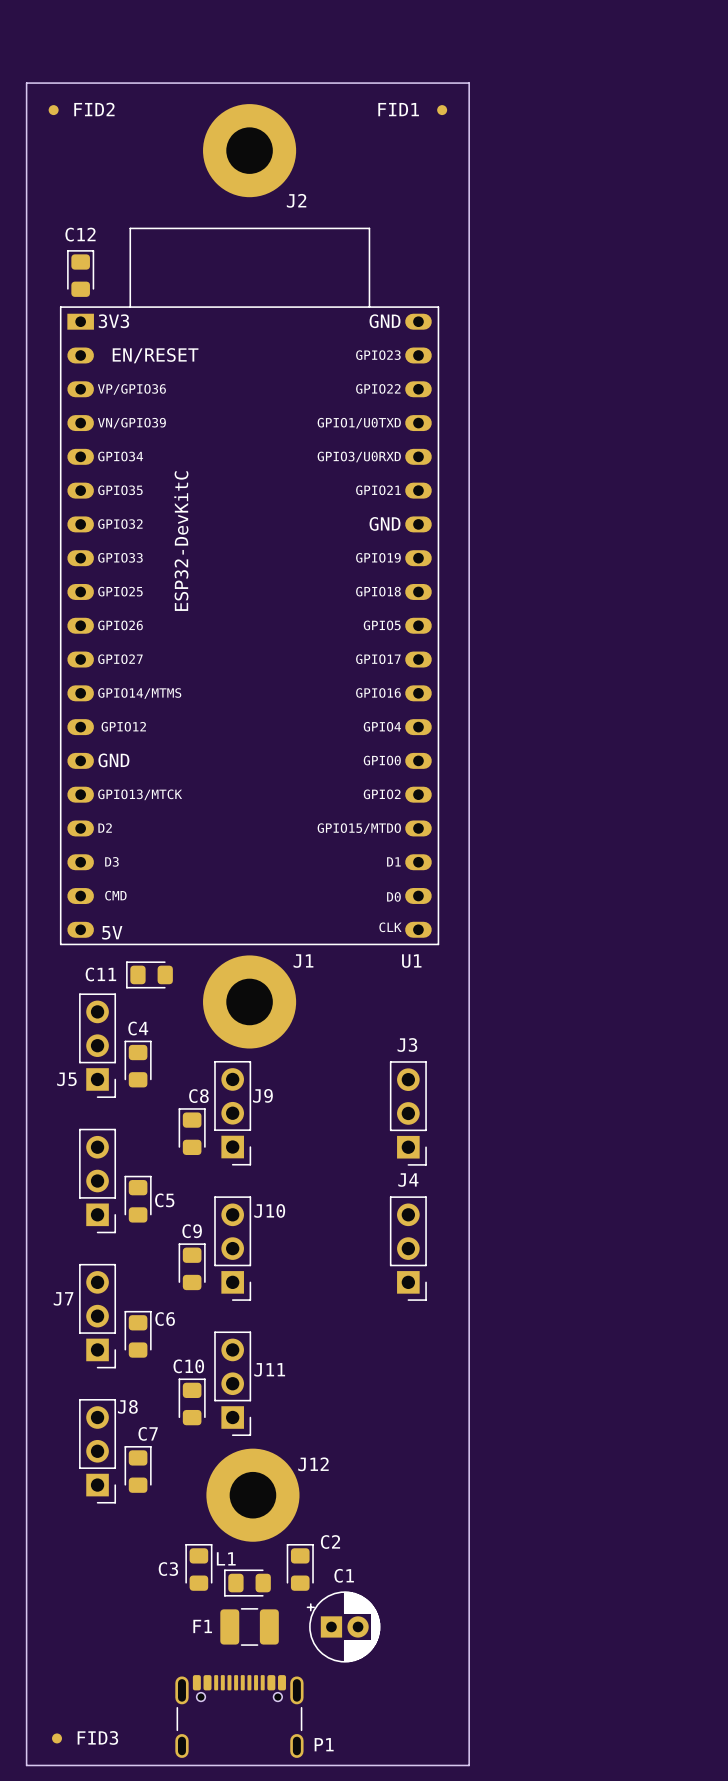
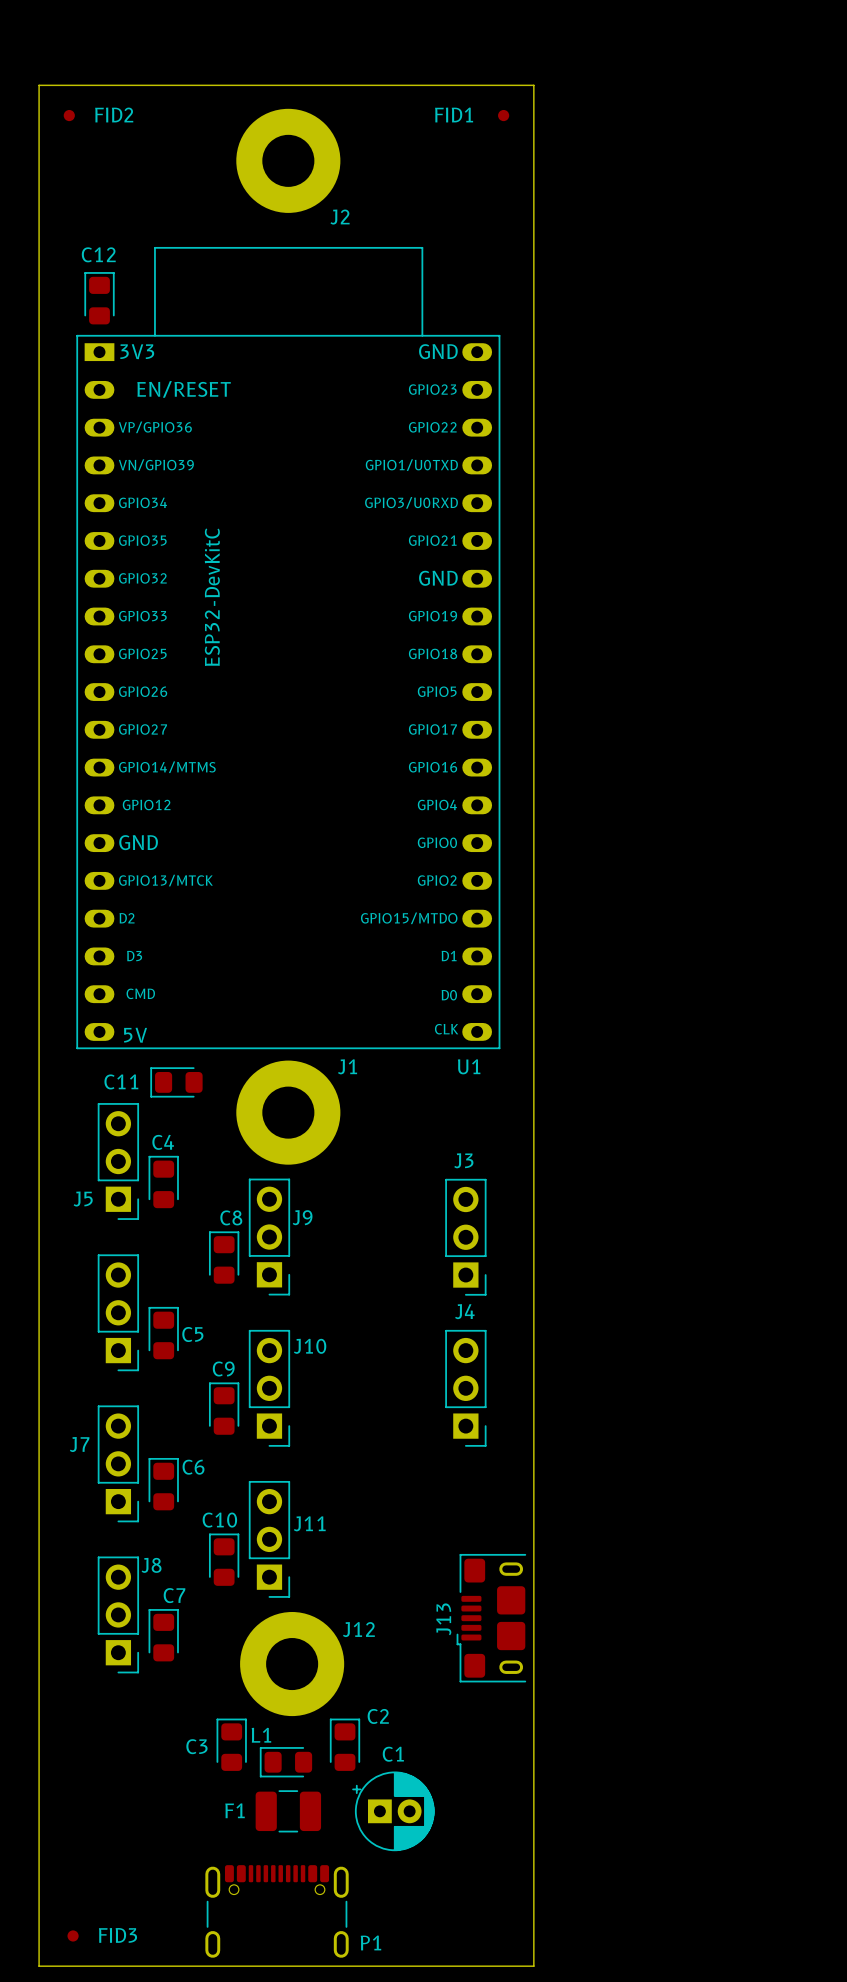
J13: none -> (491, 1618)

